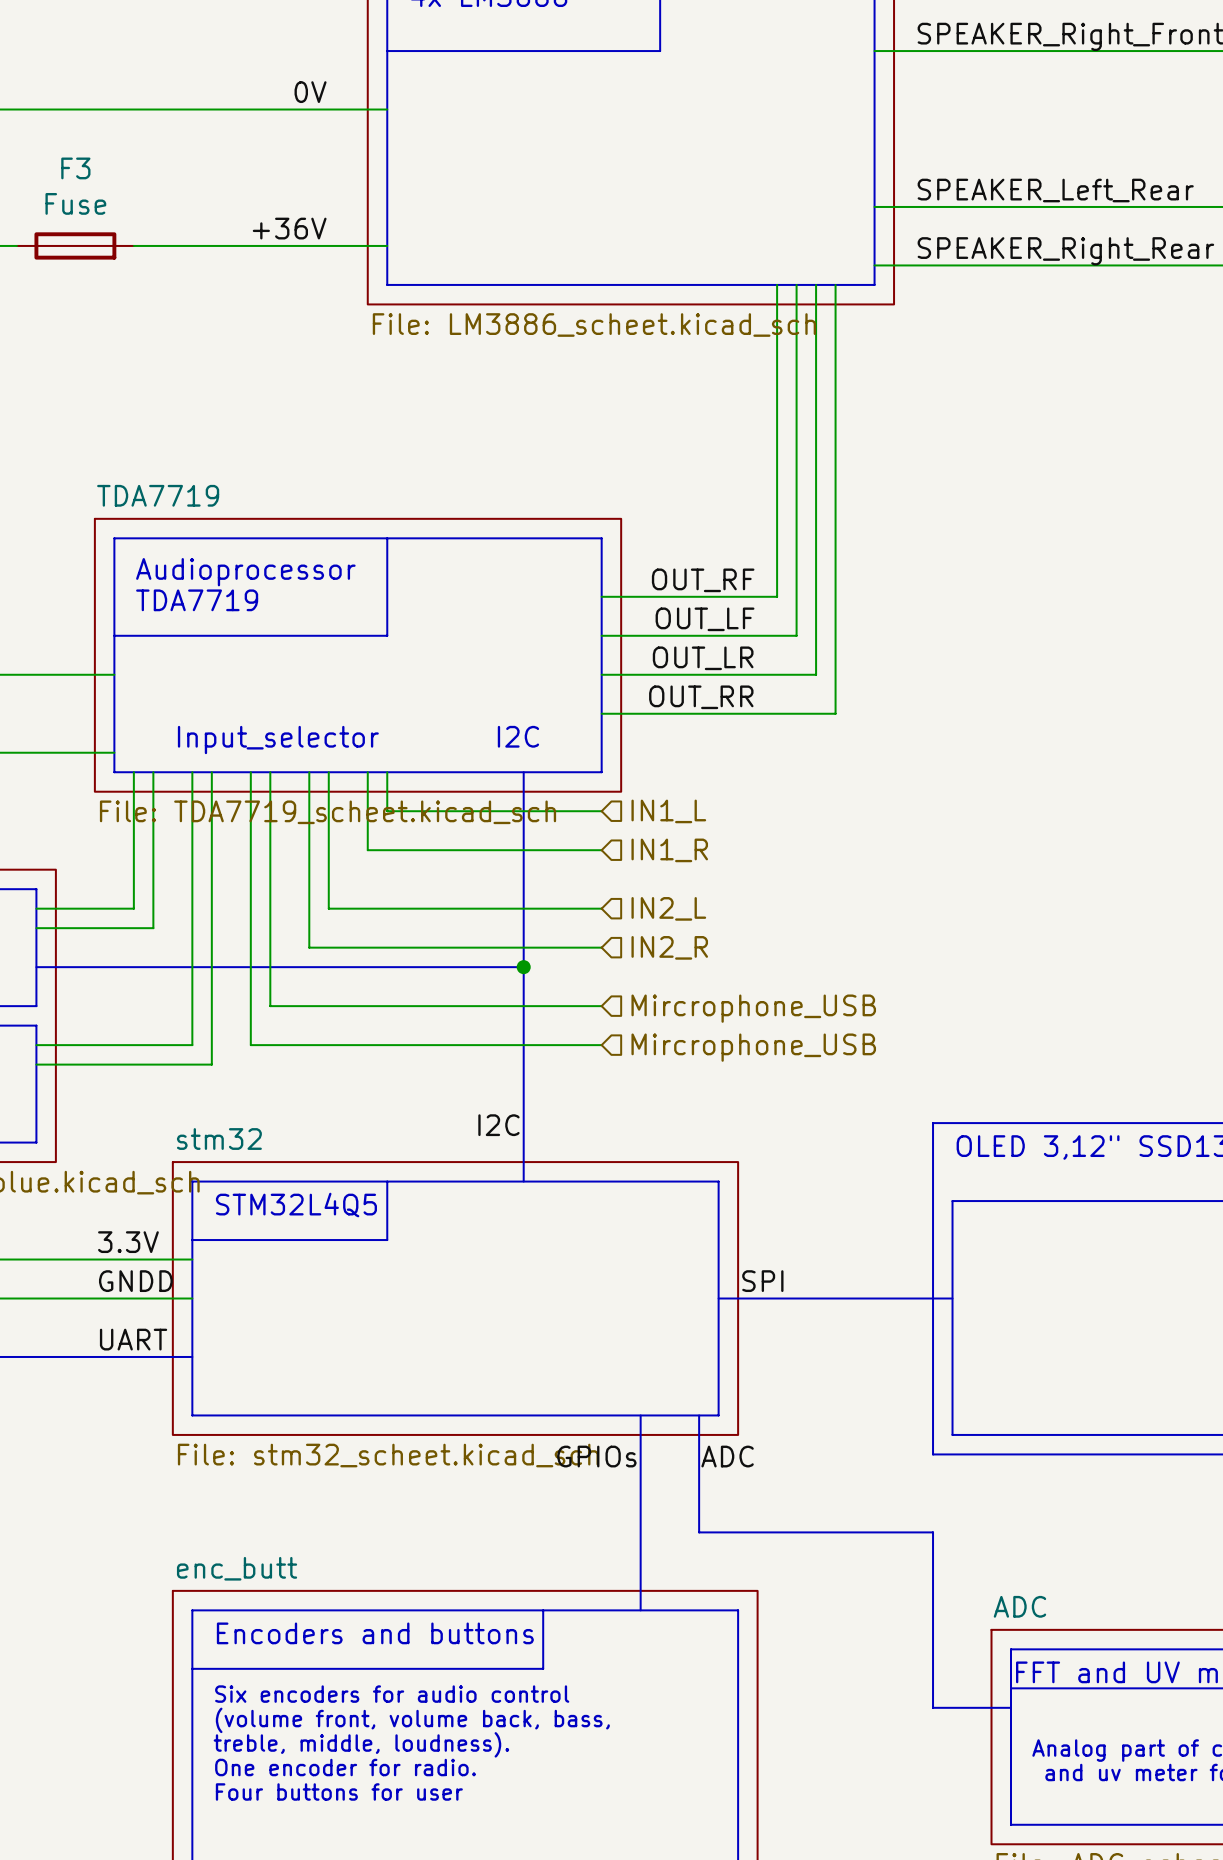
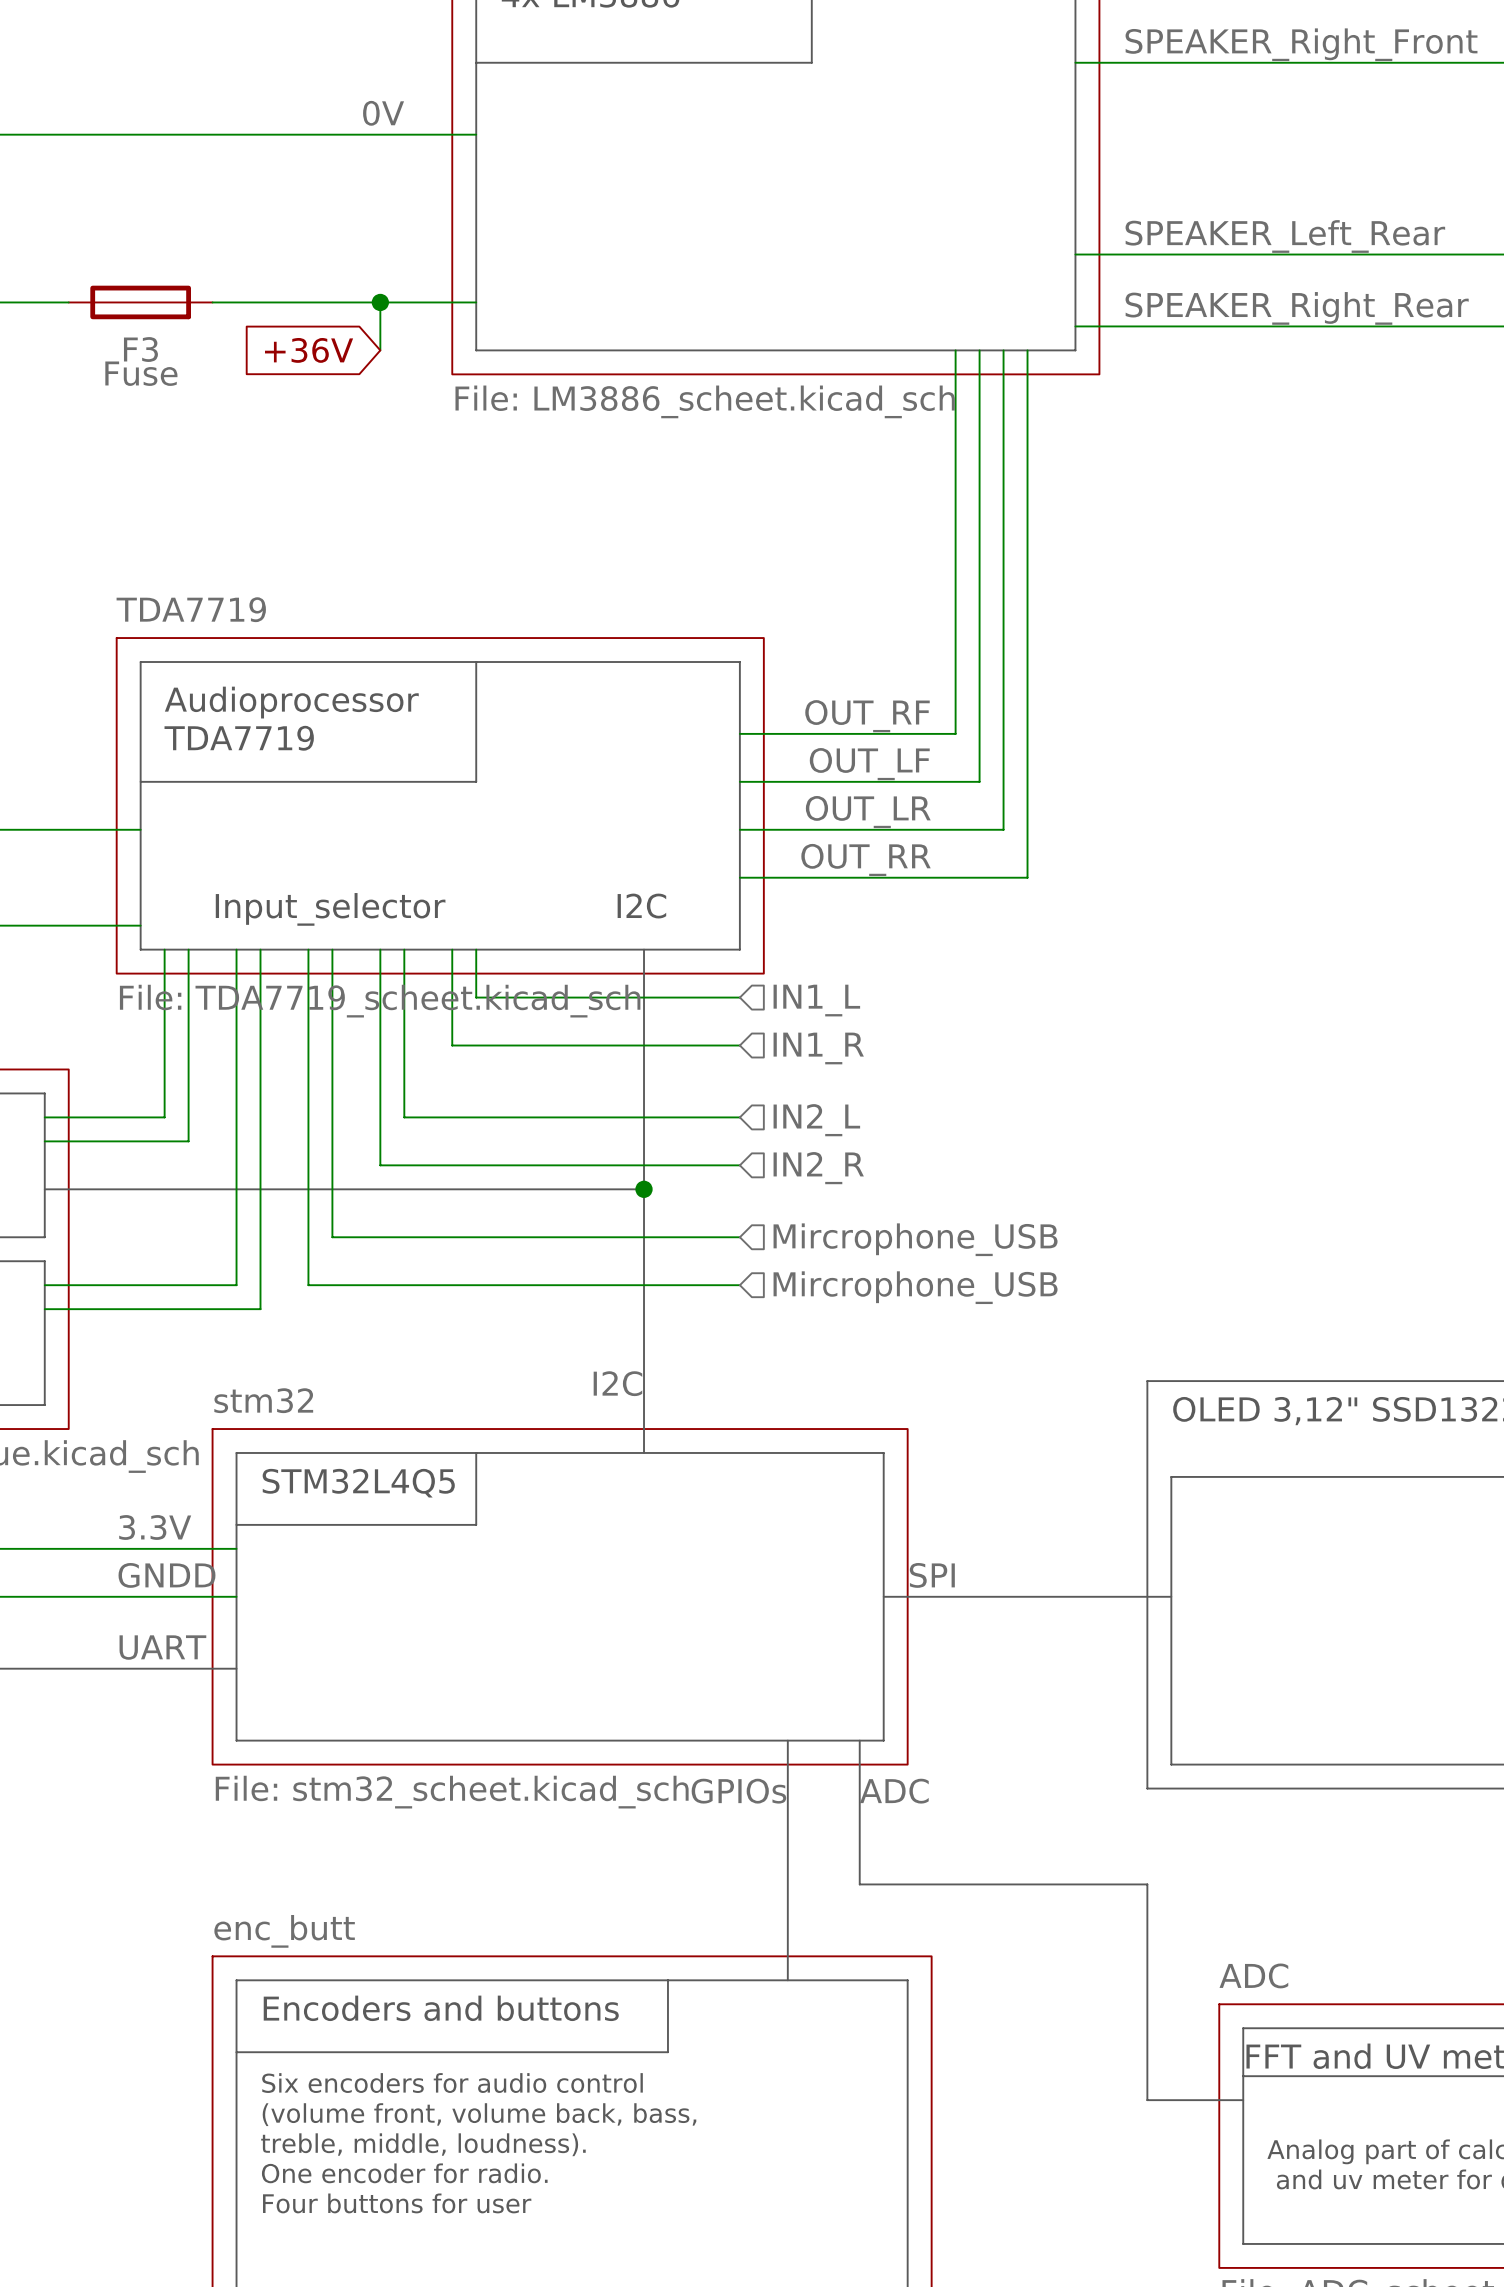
F3 name position: F3 (75, 168) -> F3 (140, 349)
F3 value position: Fuse (75, 203) -> Fuse (141, 373)
label: +36V (289, 228) -> none
F3 position: (75, 245) -> (140, 302)
wire: none -> (380, 302) (380, 350)
junction: none -> (380, 302)
global label: none -> +36V (309, 350)

